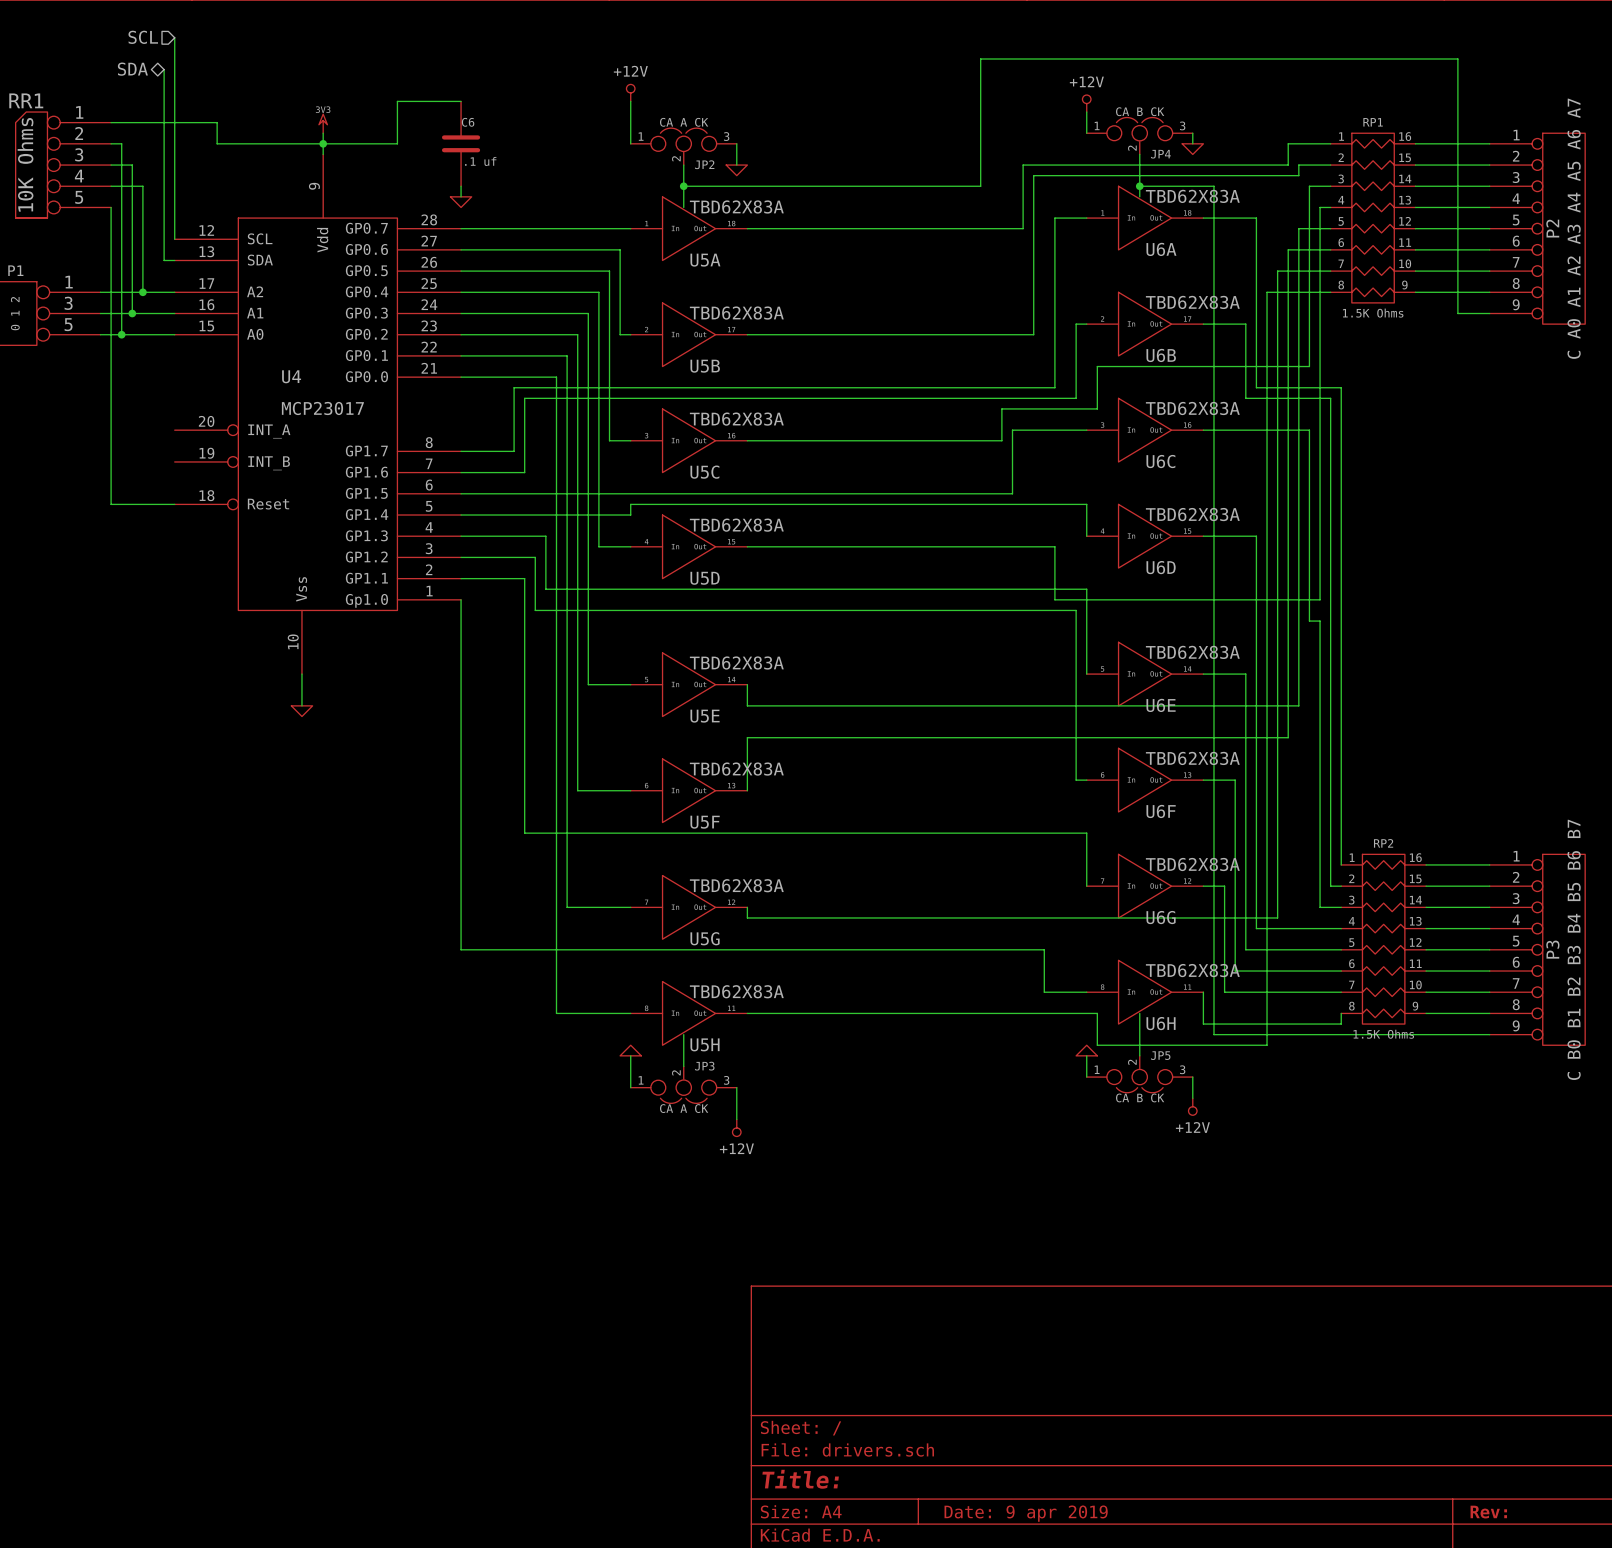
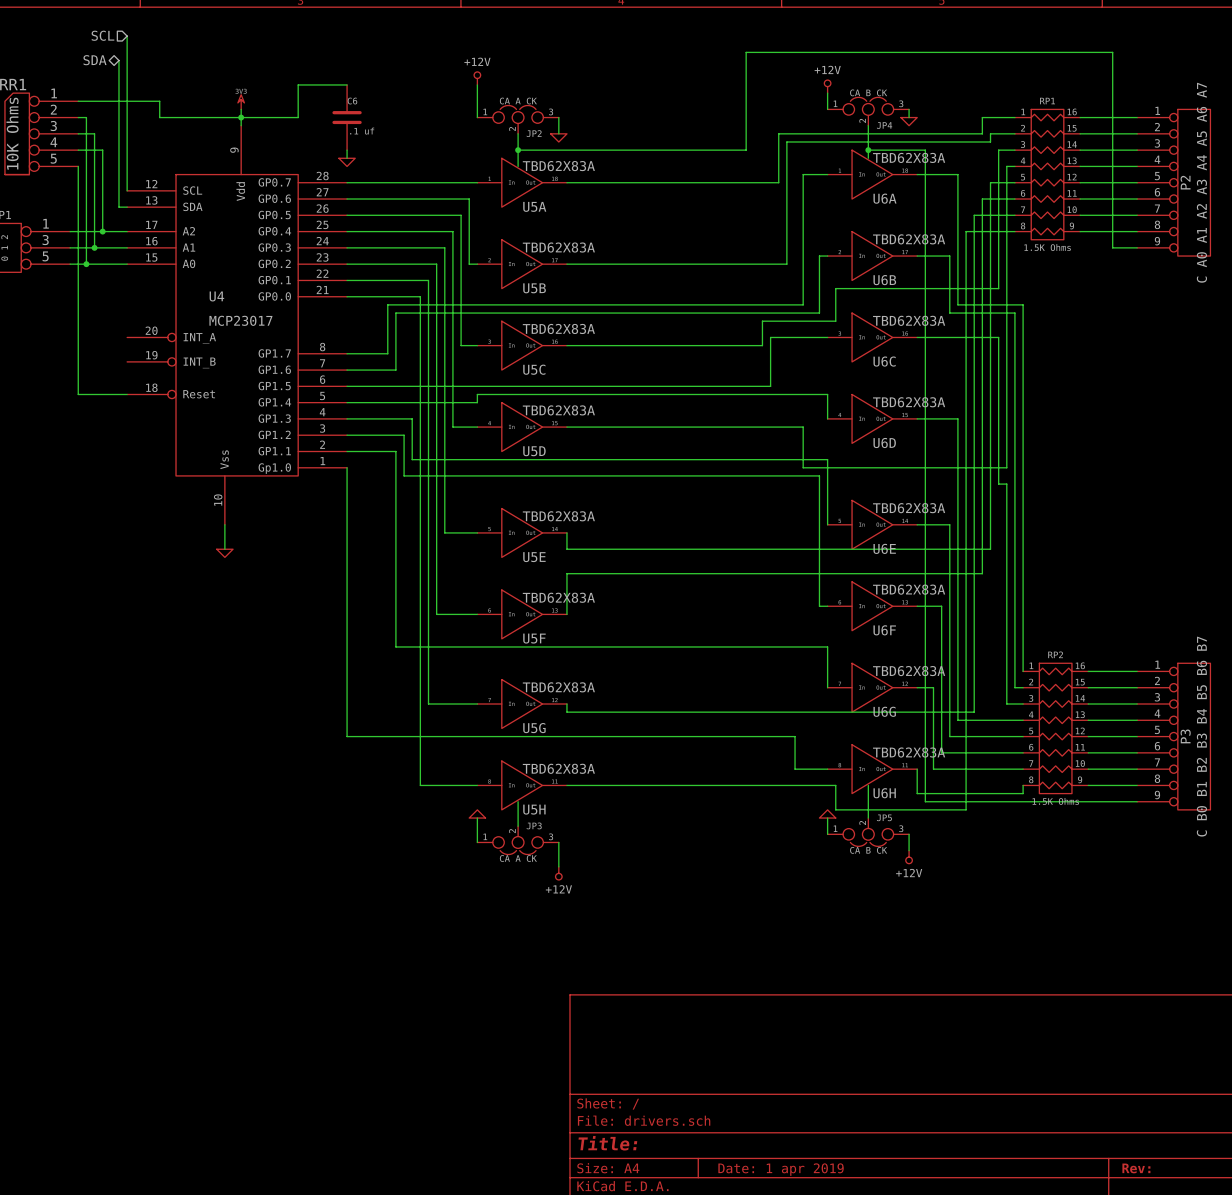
title block: Date: 9 apr 2019 (1026, 1513) -> Date: 1 apr 2019 (781, 1169)

